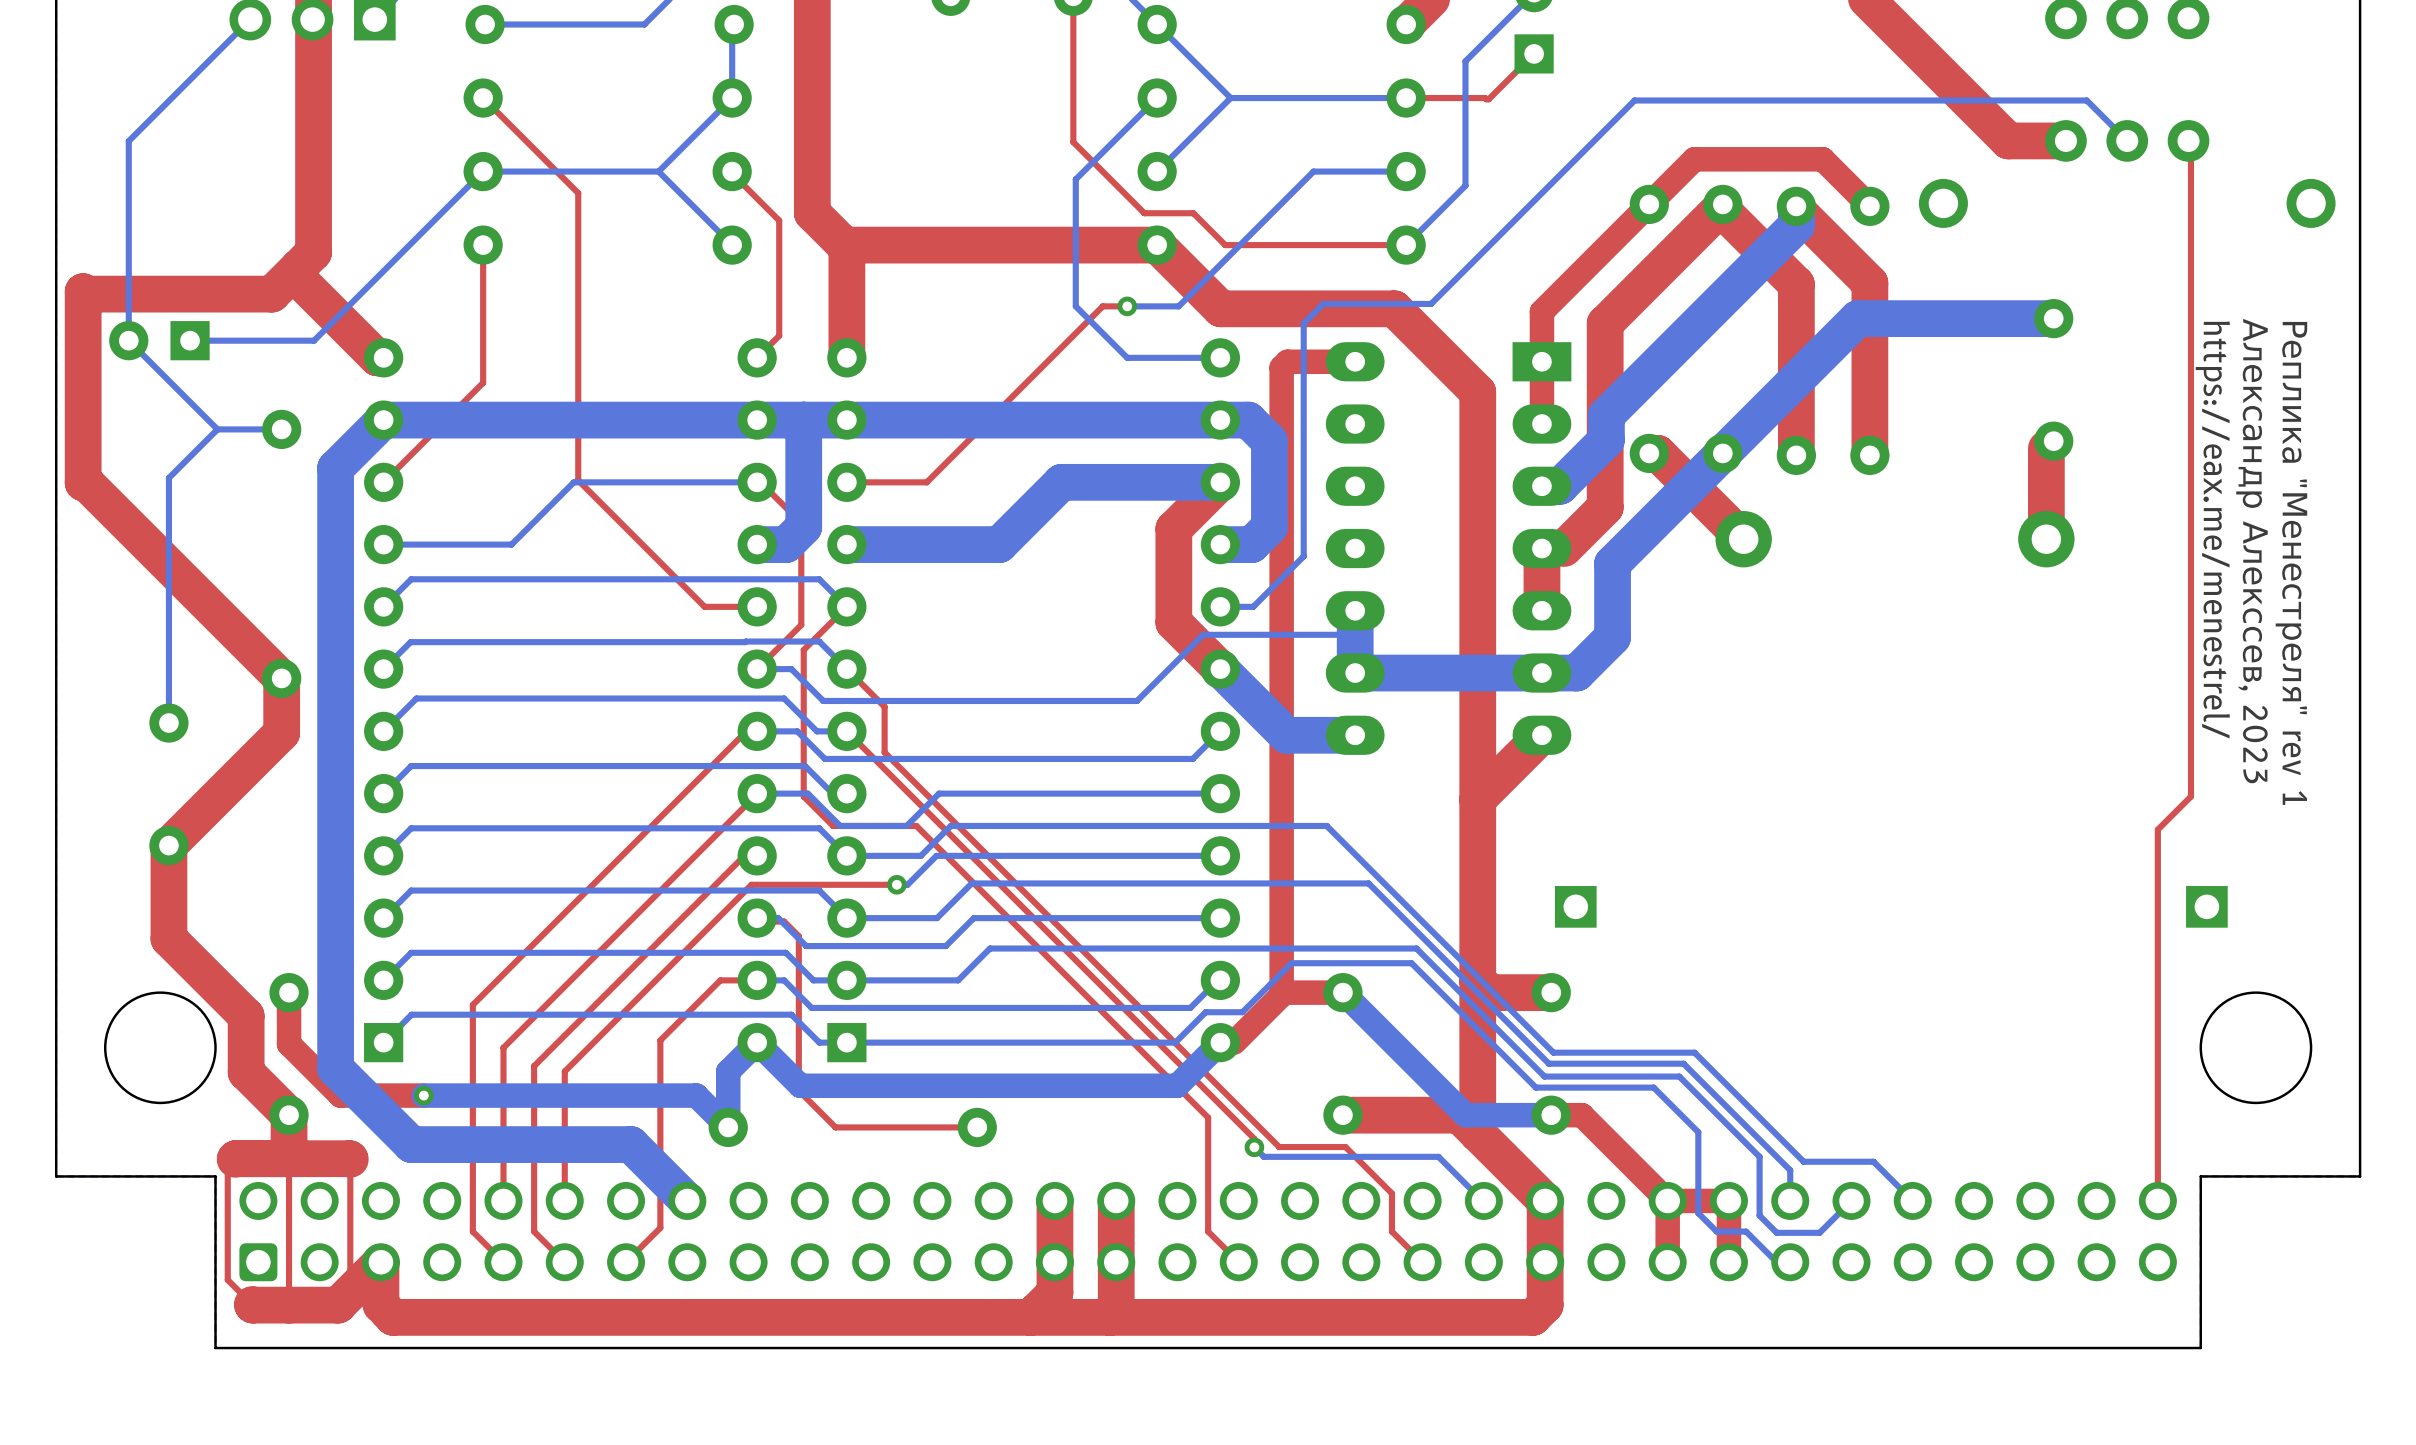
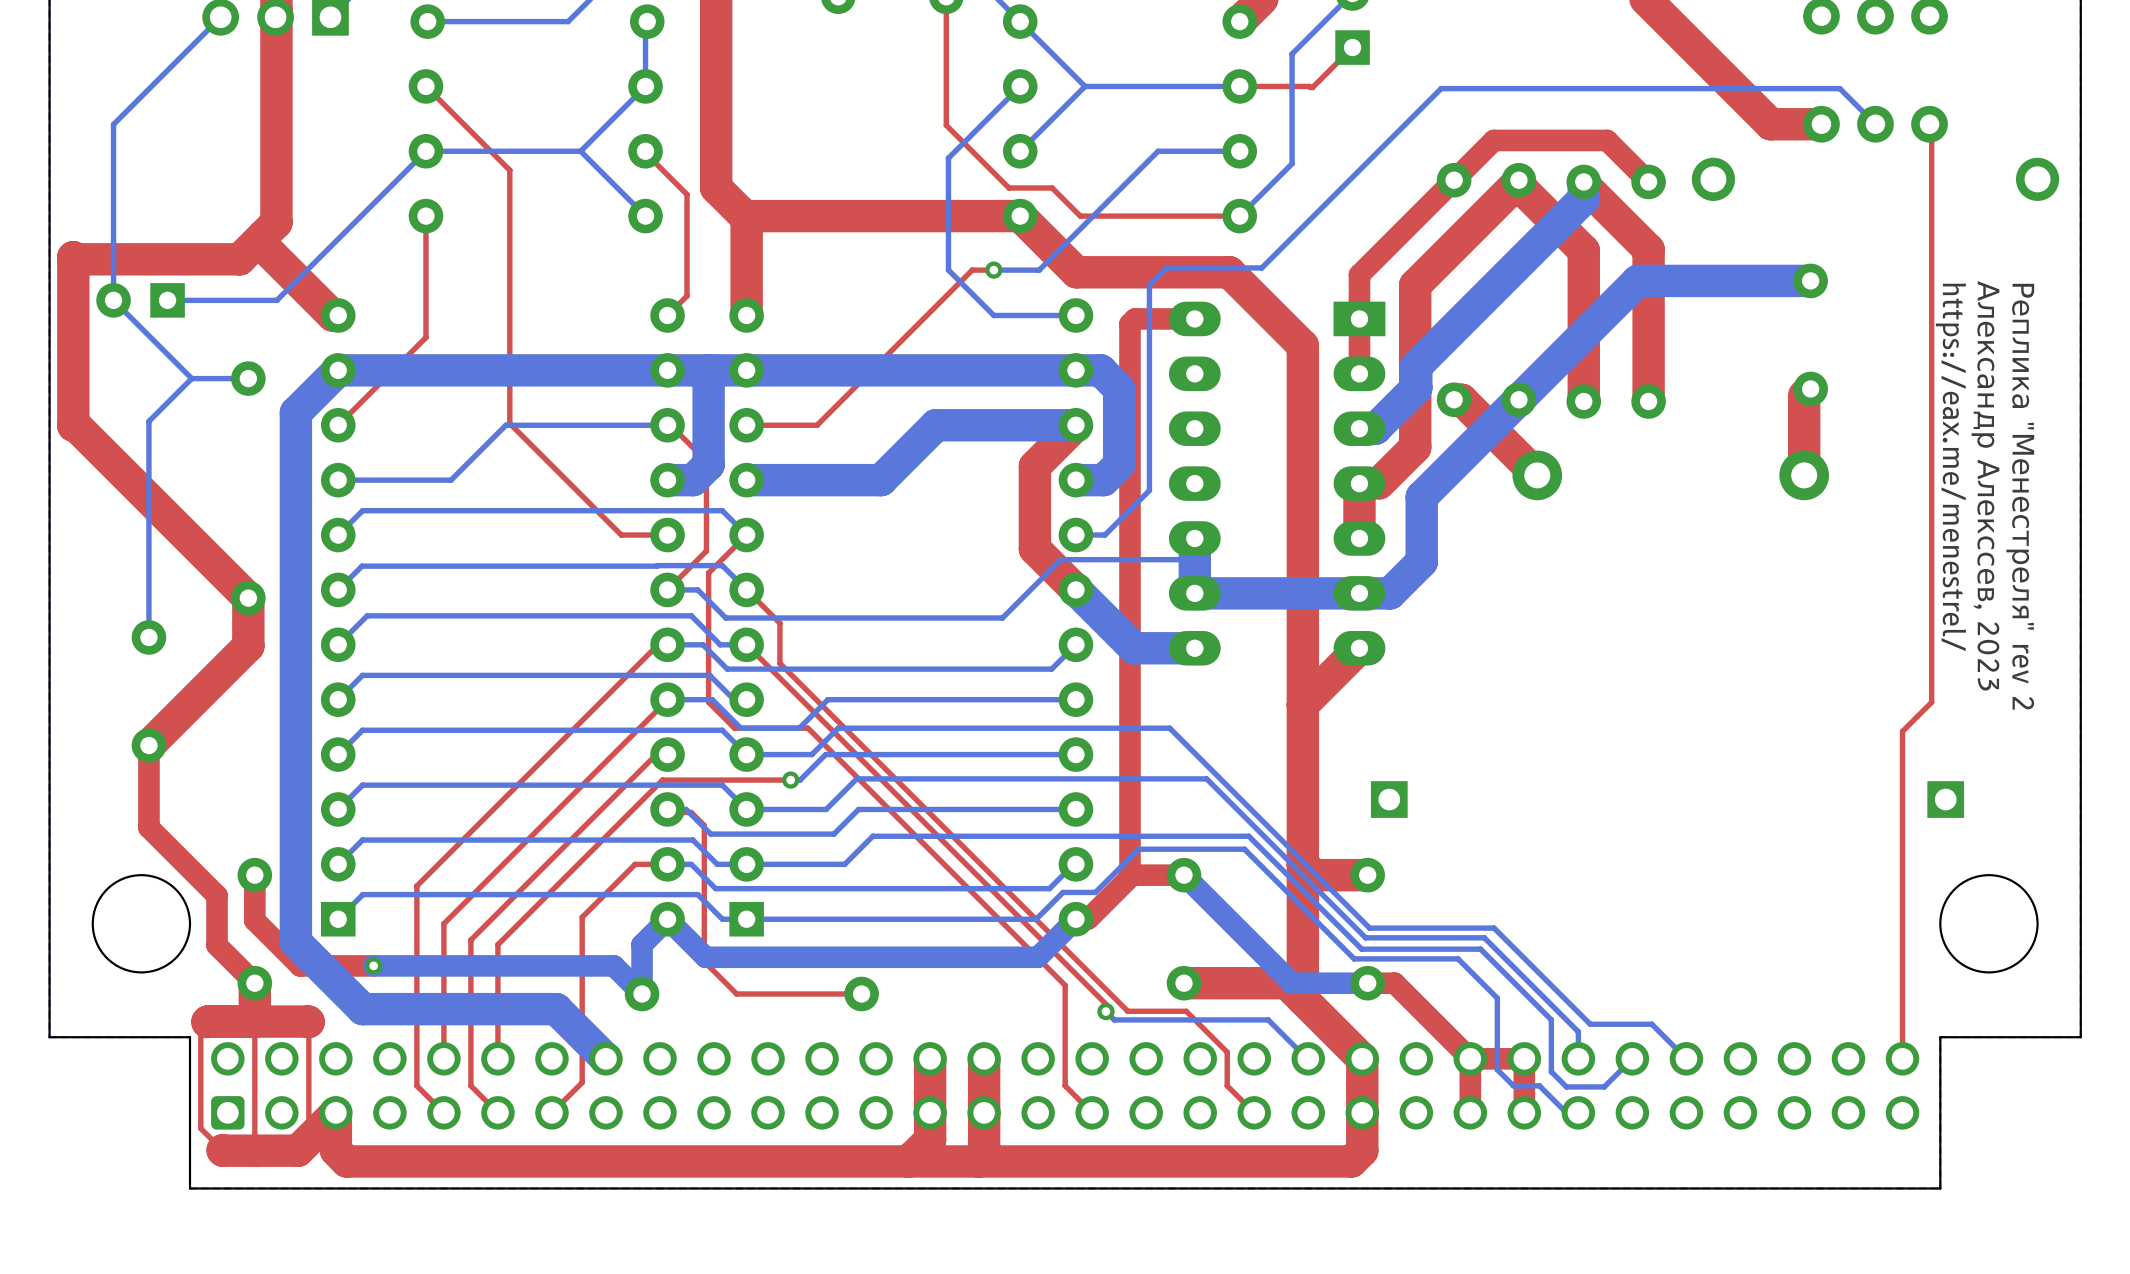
text: Реплика "Менестреля" rev 1 (2291, 563) -> Реплика "Менестреля" rev 2 (2020, 496)
top track width: thick (168, 845) (168, 938) (246, 1015) (246, 1072) (289, 1115) -> thin (148, 745) (148, 827) (217, 895) (217, 945) (254, 983)

